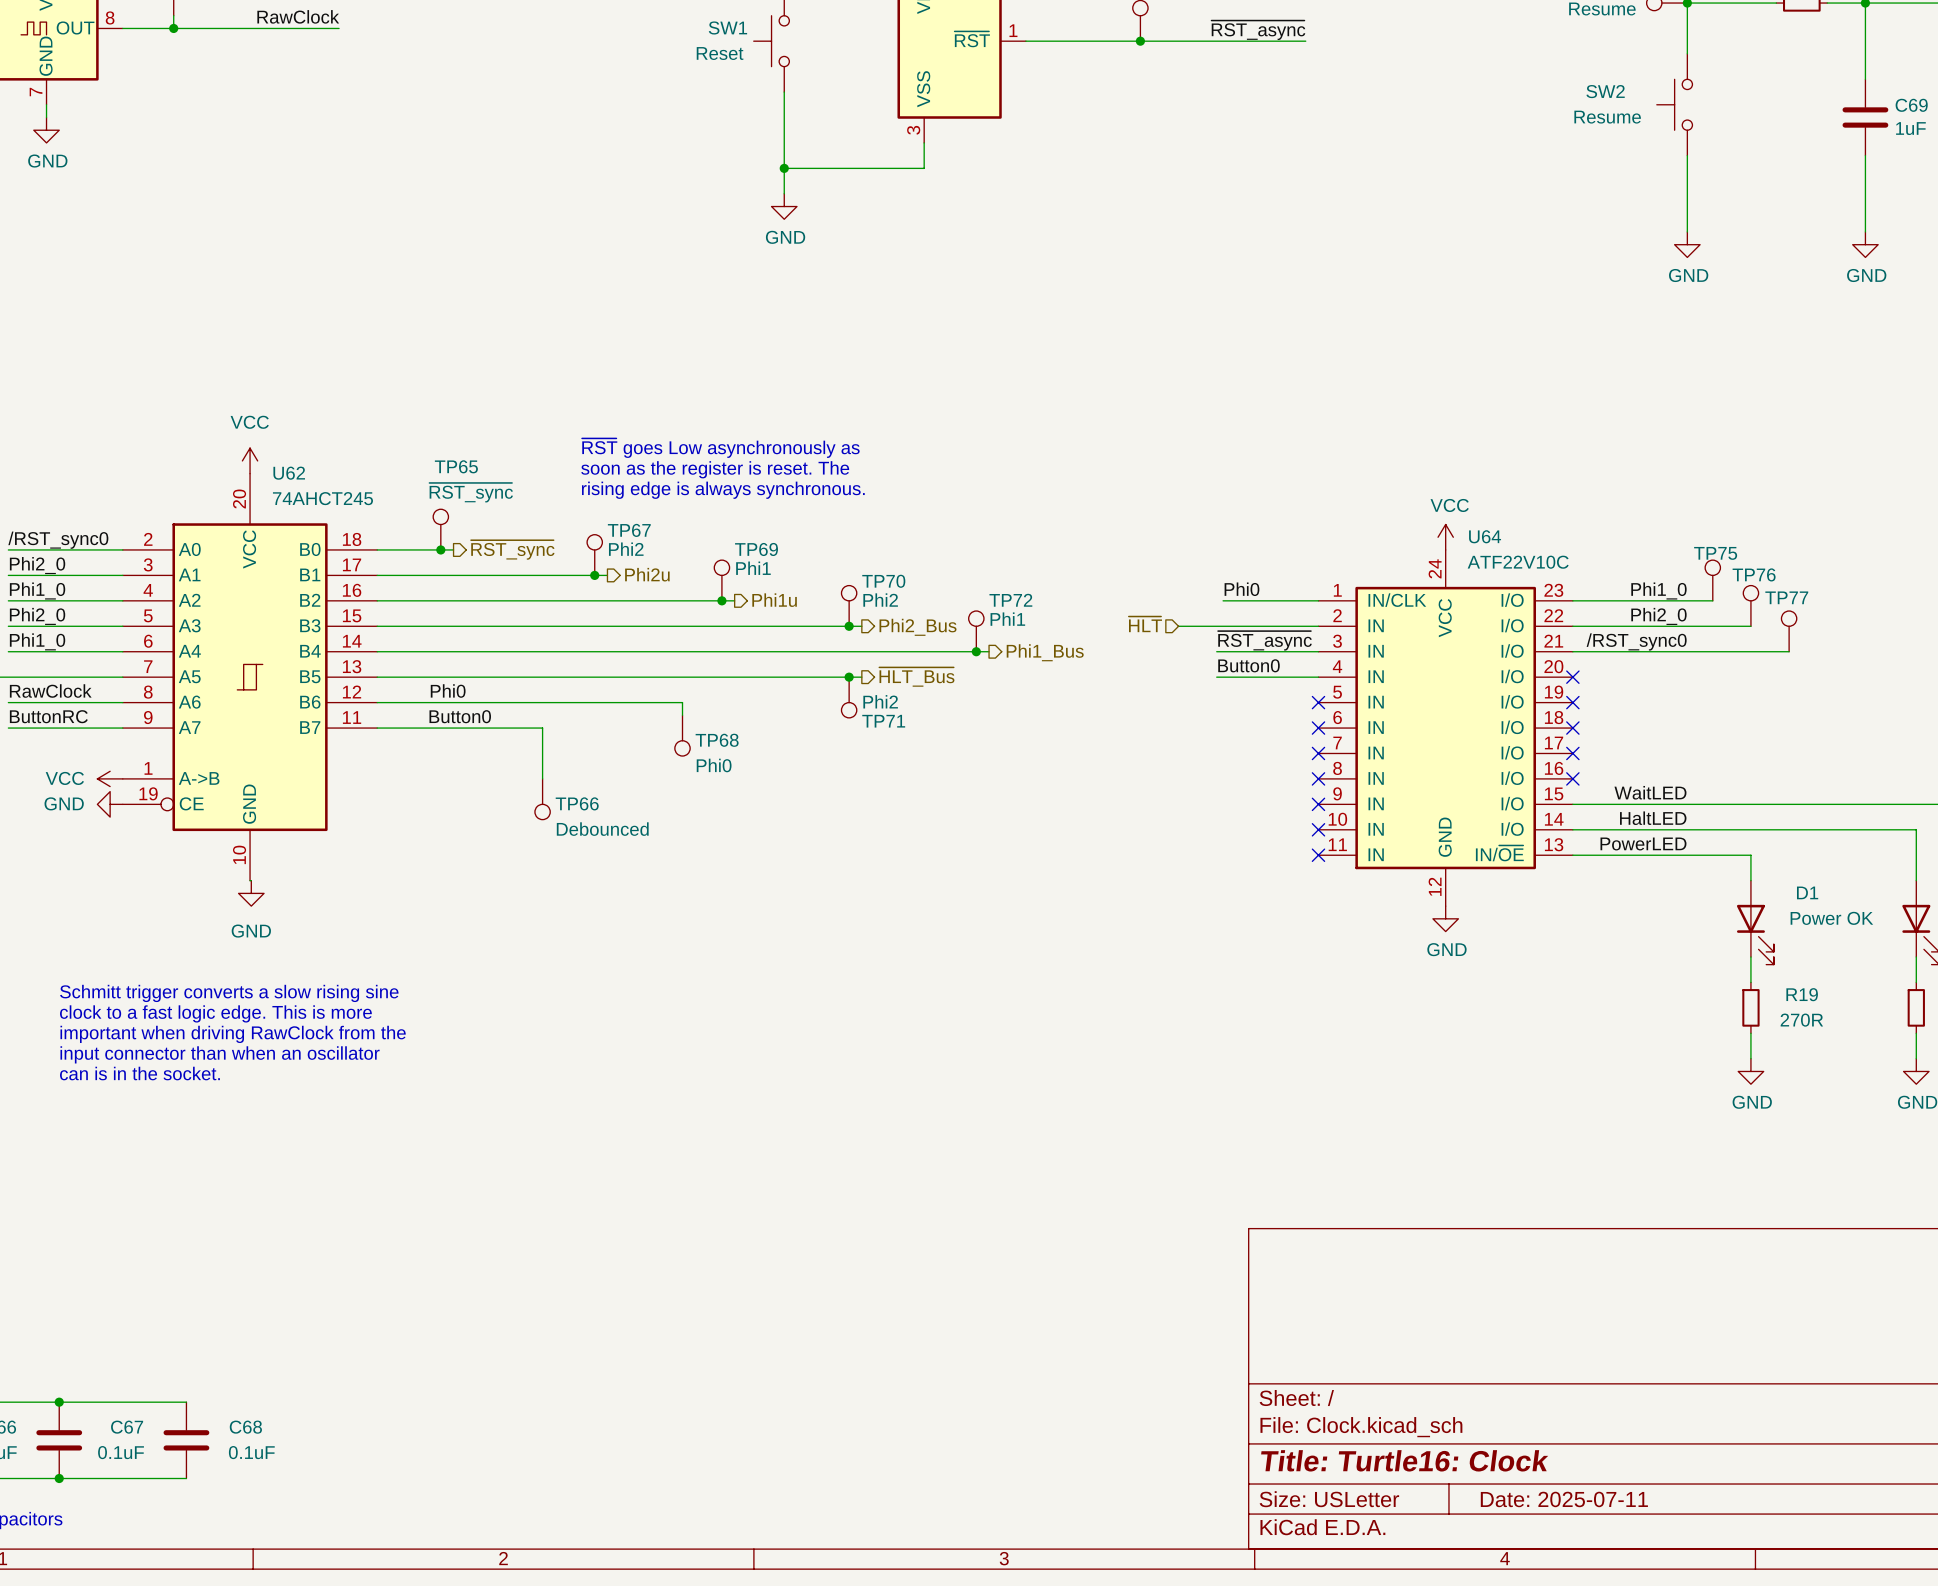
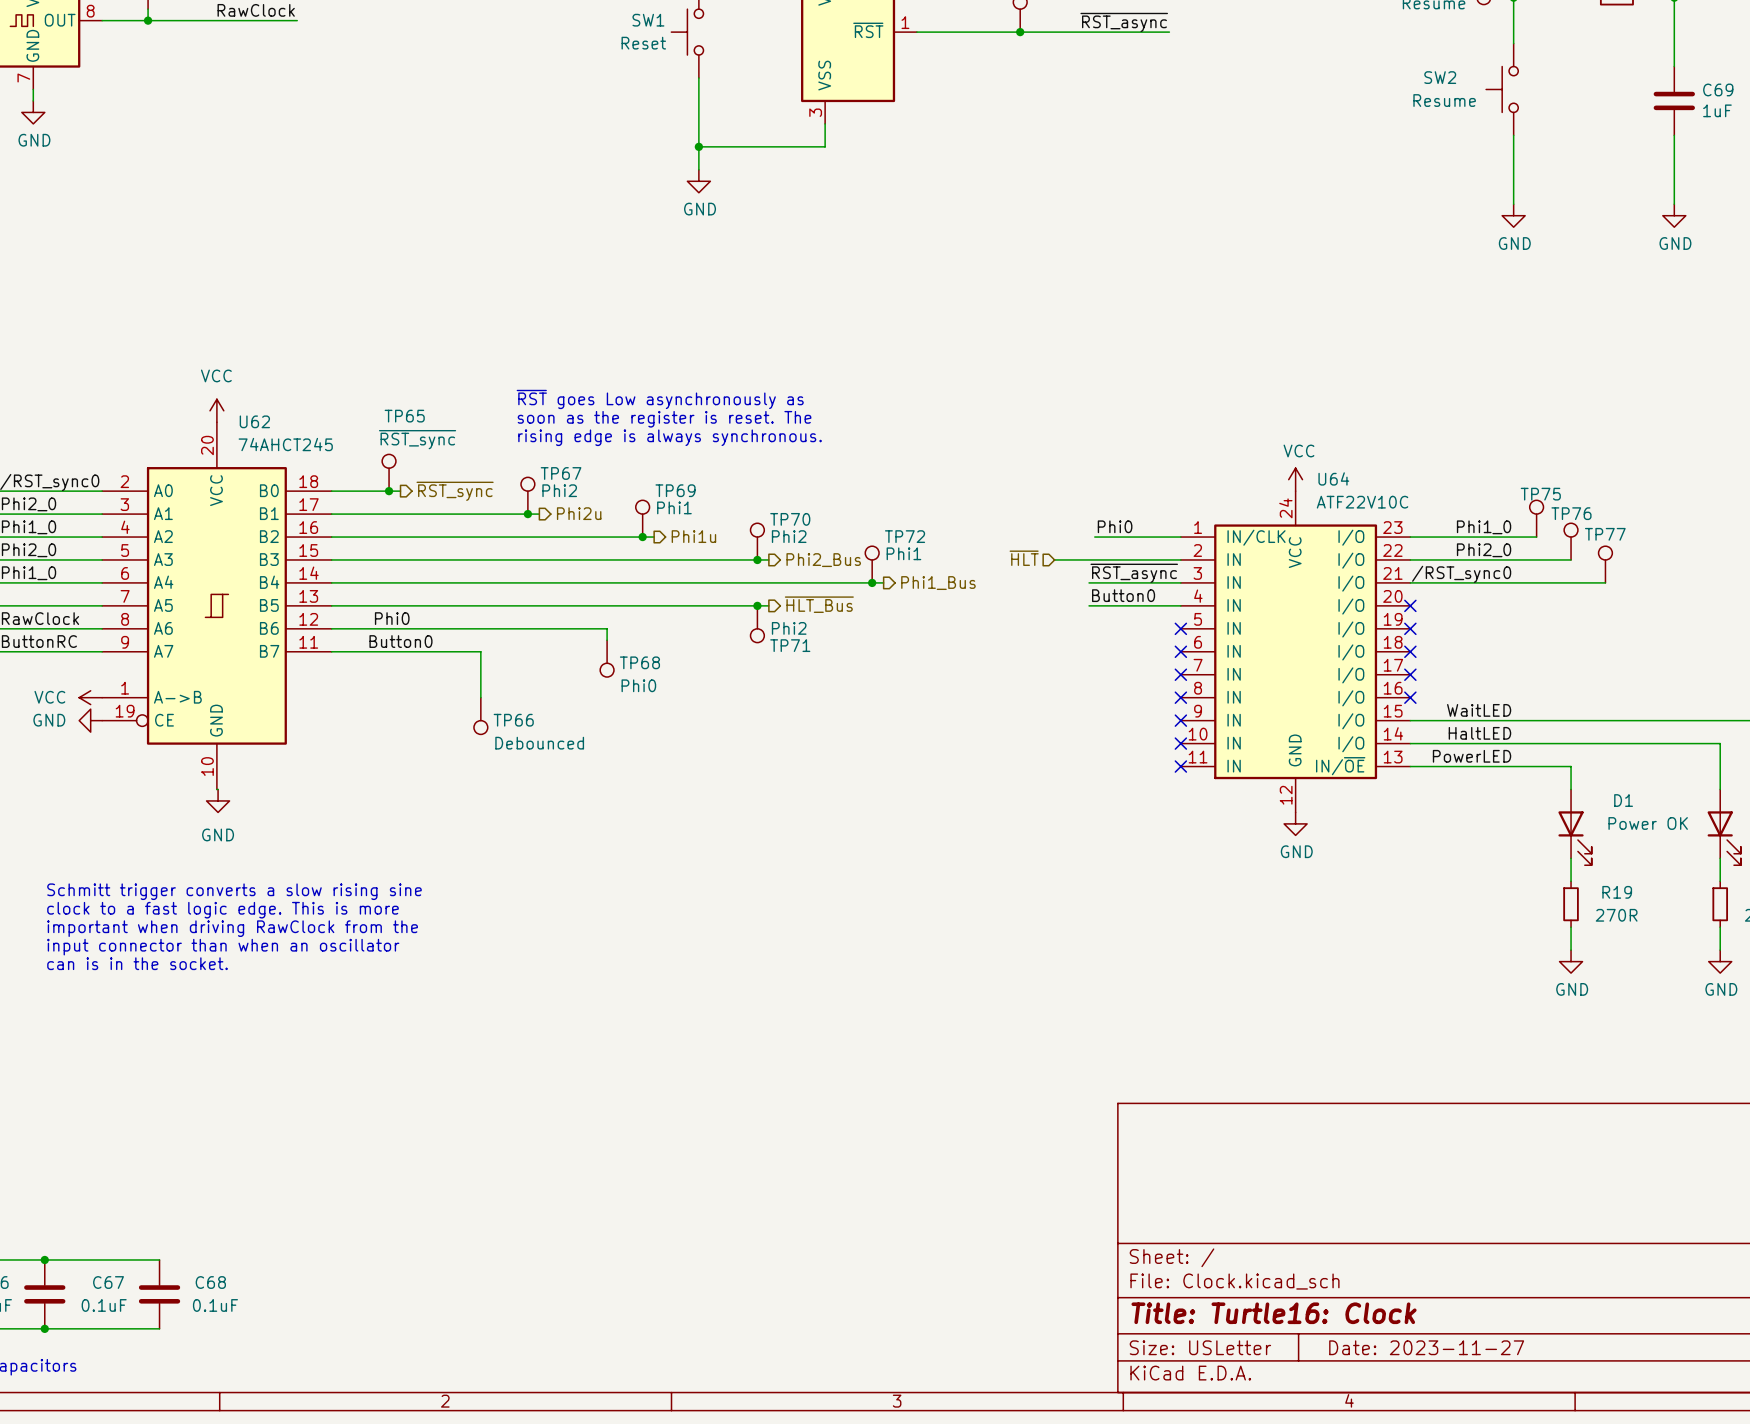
title block: Date: 2025-07-11 (1564, 1499) -> Date: 2023-11-27 (1426, 1347)

